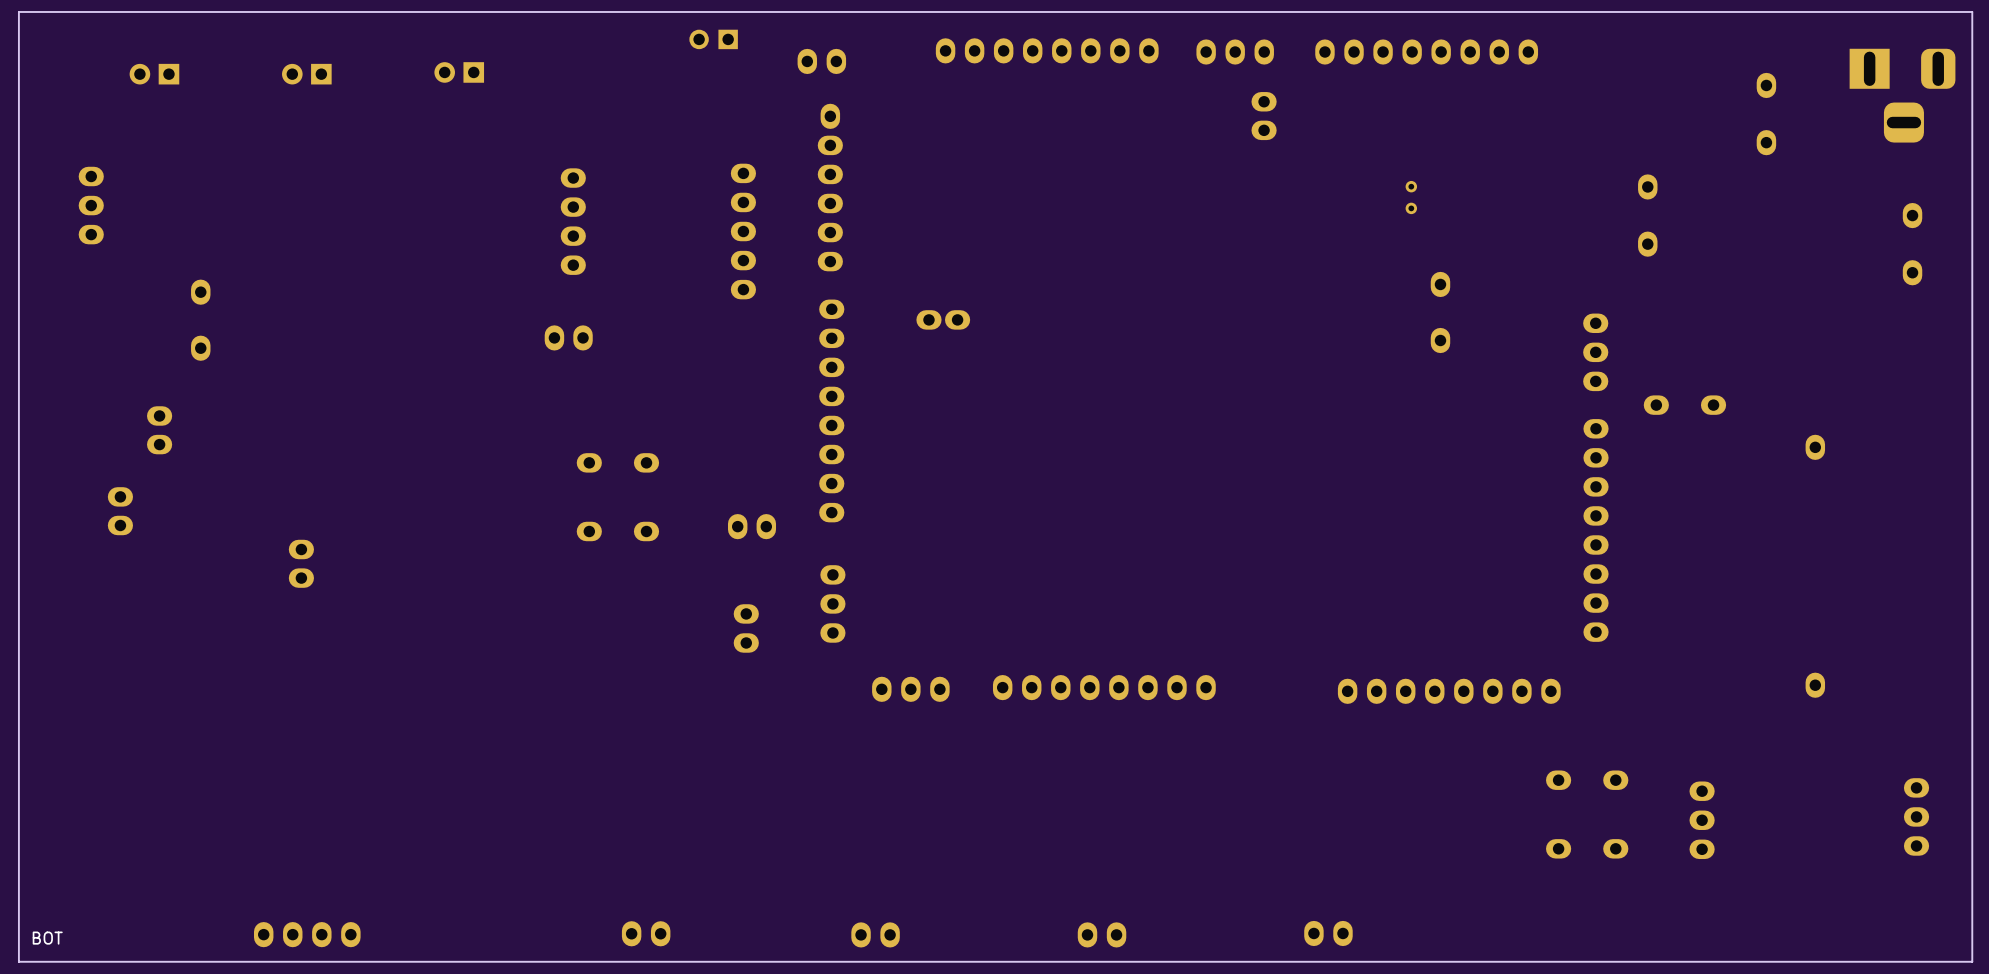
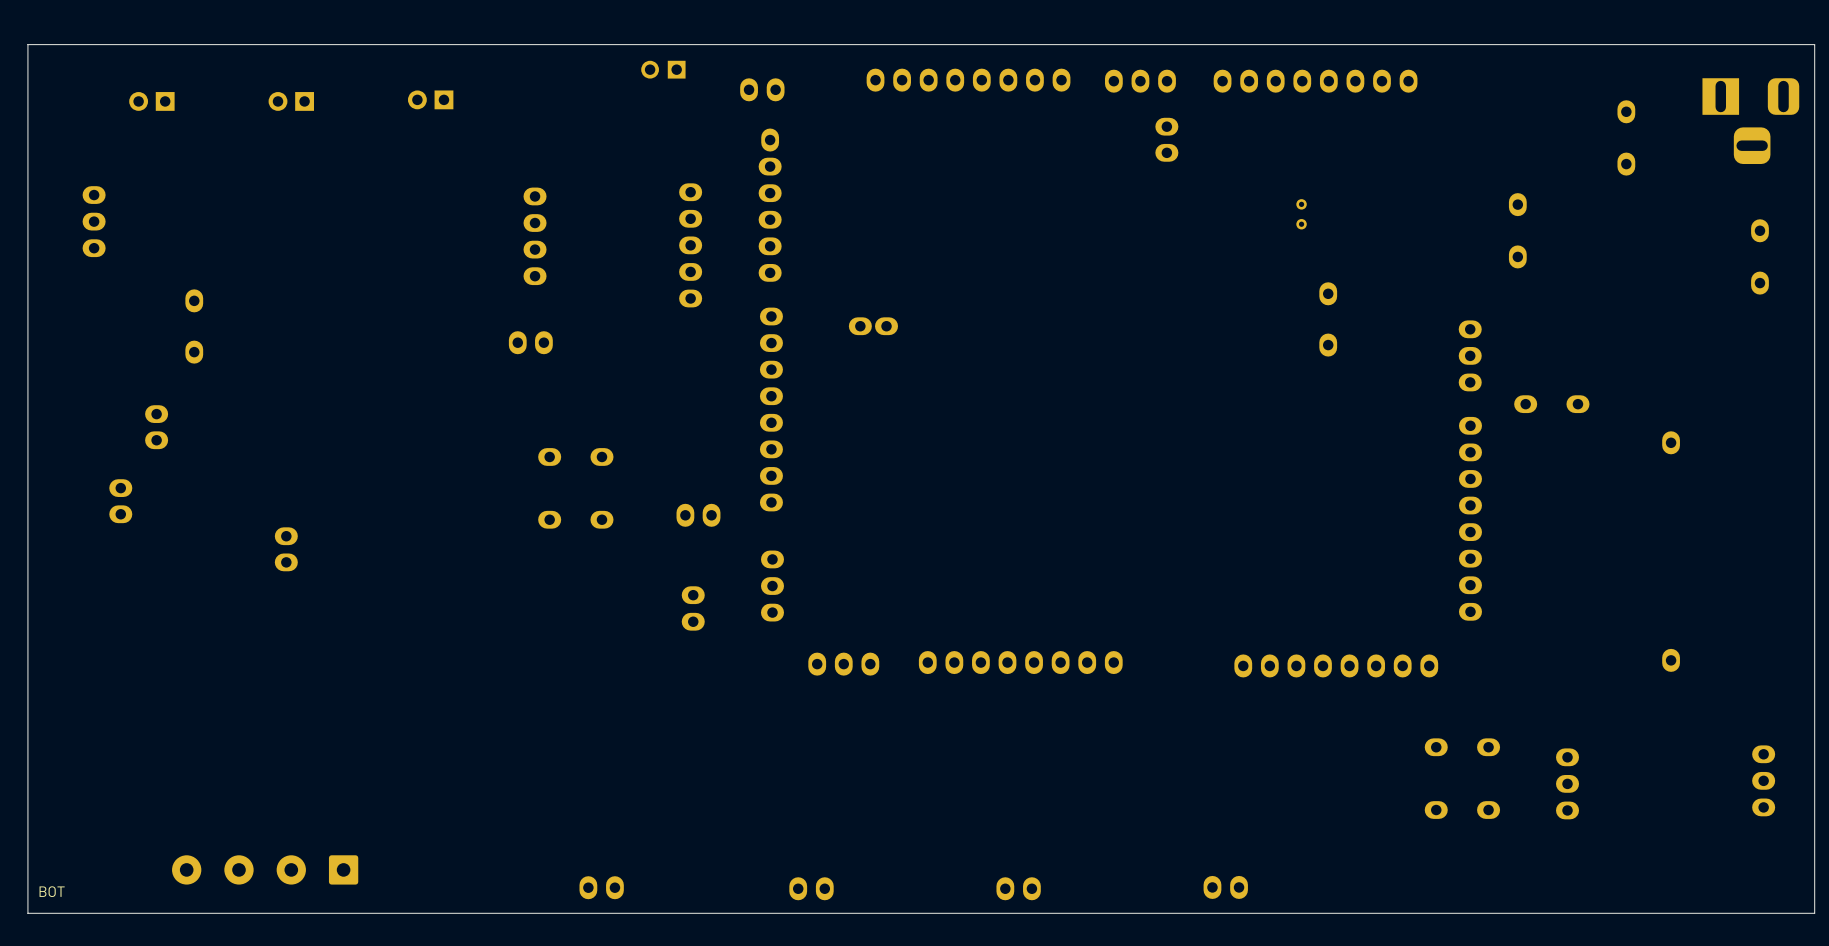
part: none -> (265, 869)
part: (307, 934) -> none

